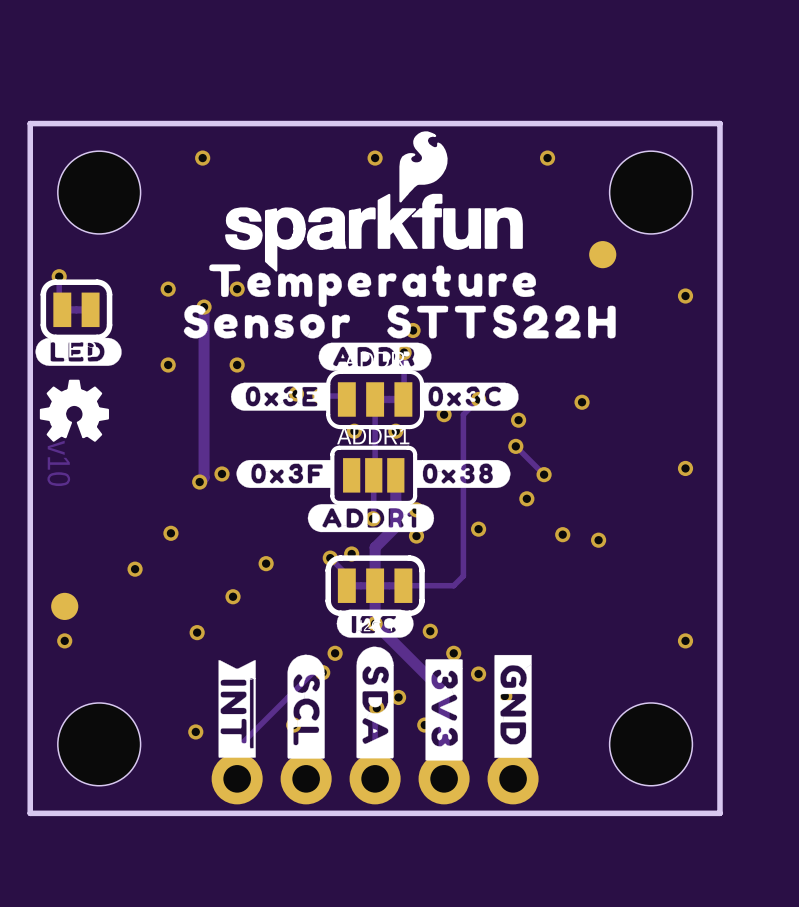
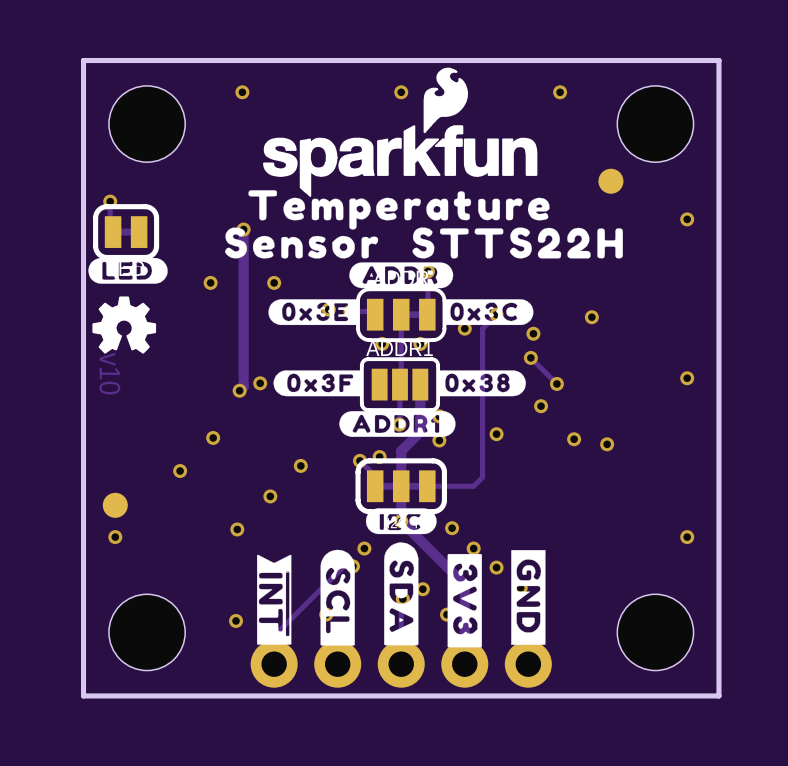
via: (168, 289) -> none
via: (237, 289) -> none
via: (413, 330) -> none

